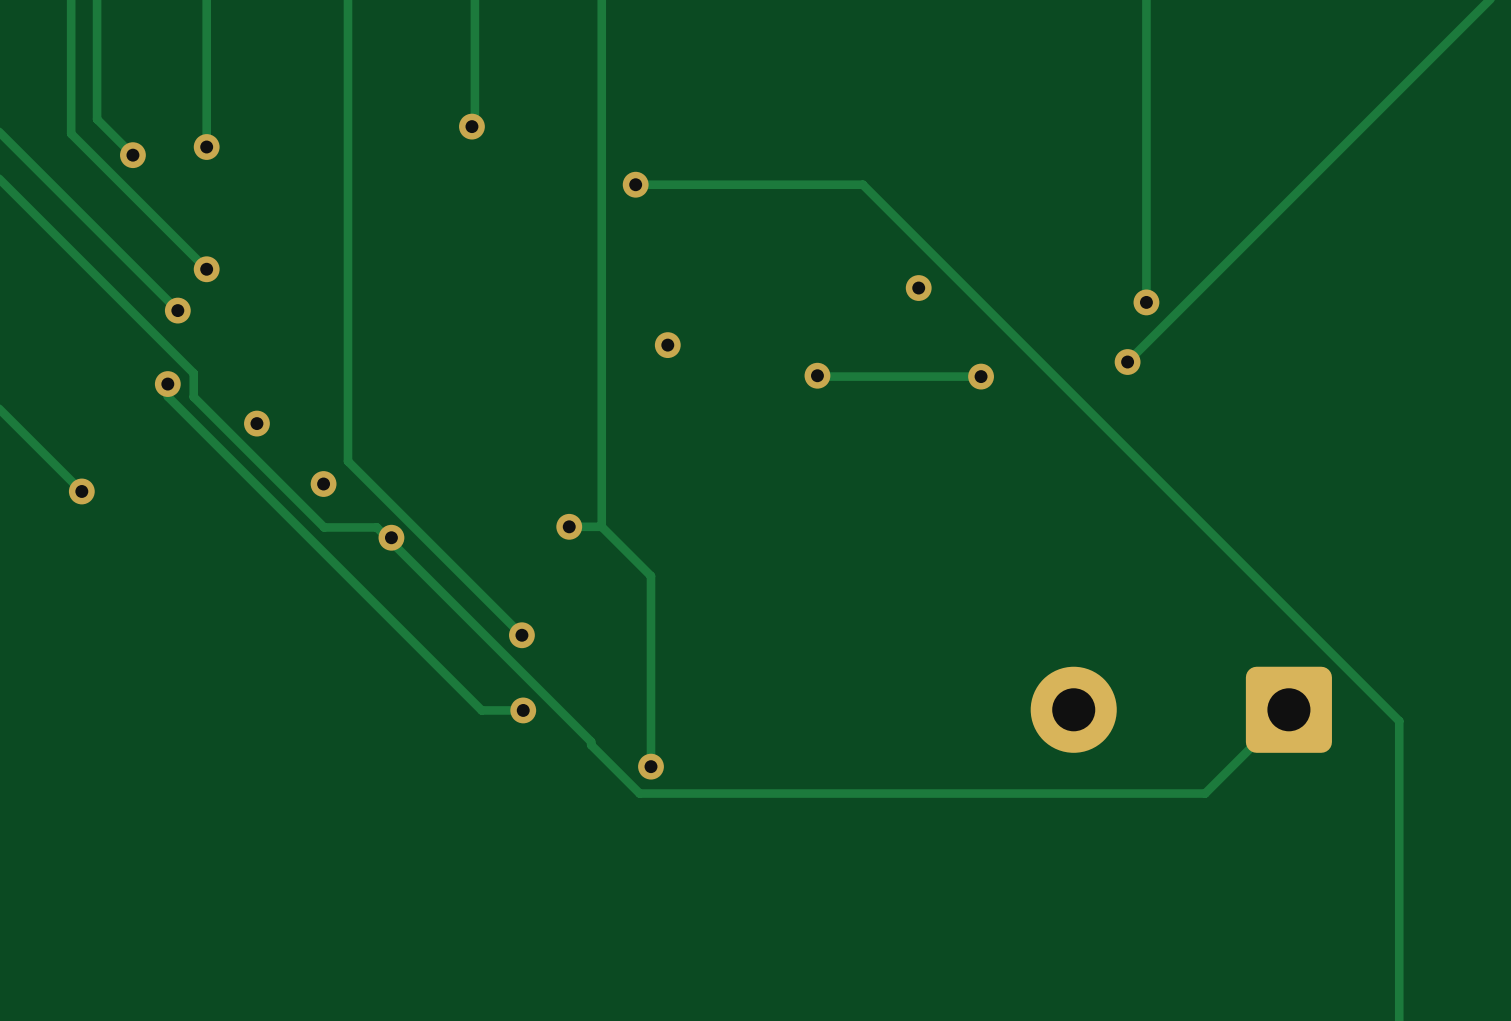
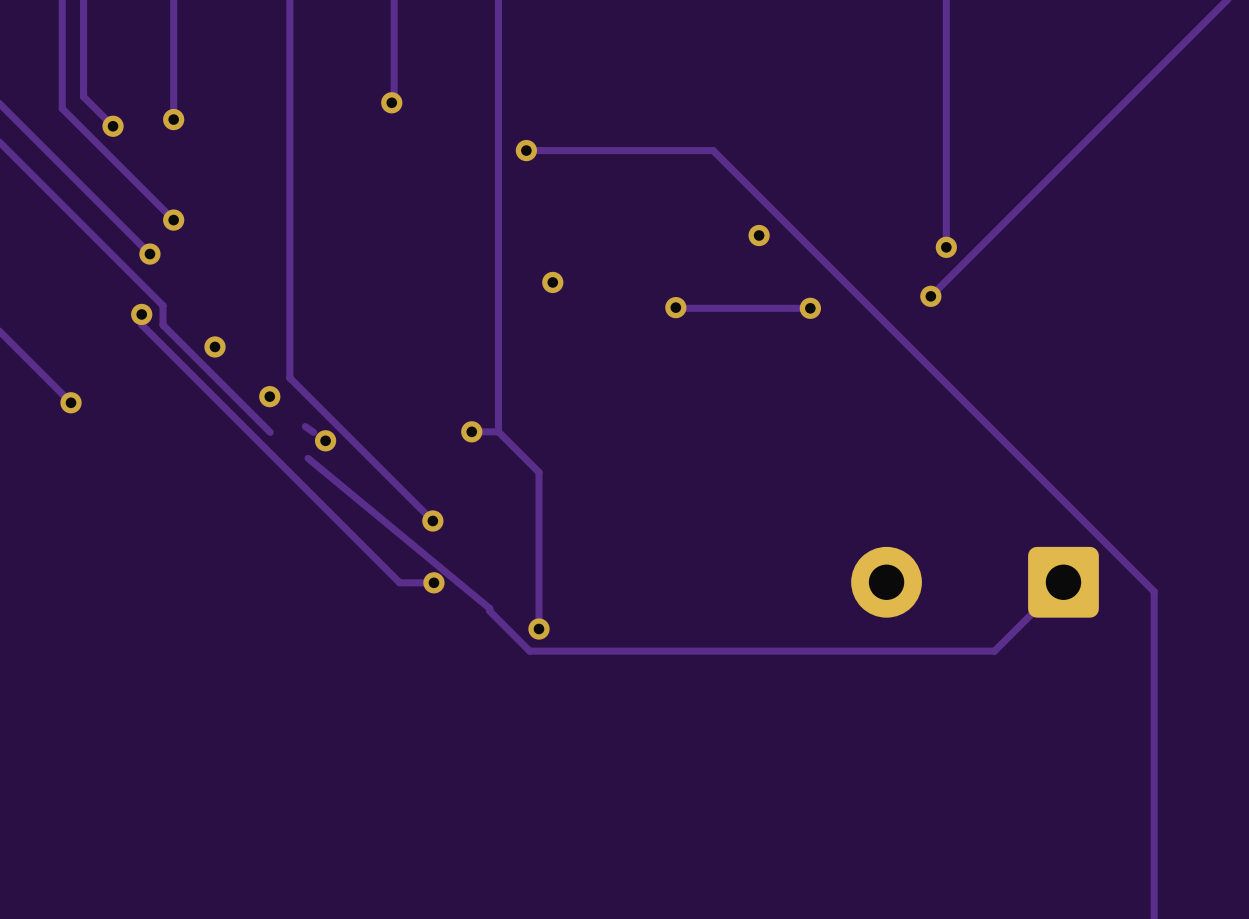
track: none -> (305, 426) (313, 432)
track: (324, 527) (376, 527) (591, 741) -> (308, 458) (489, 608)

